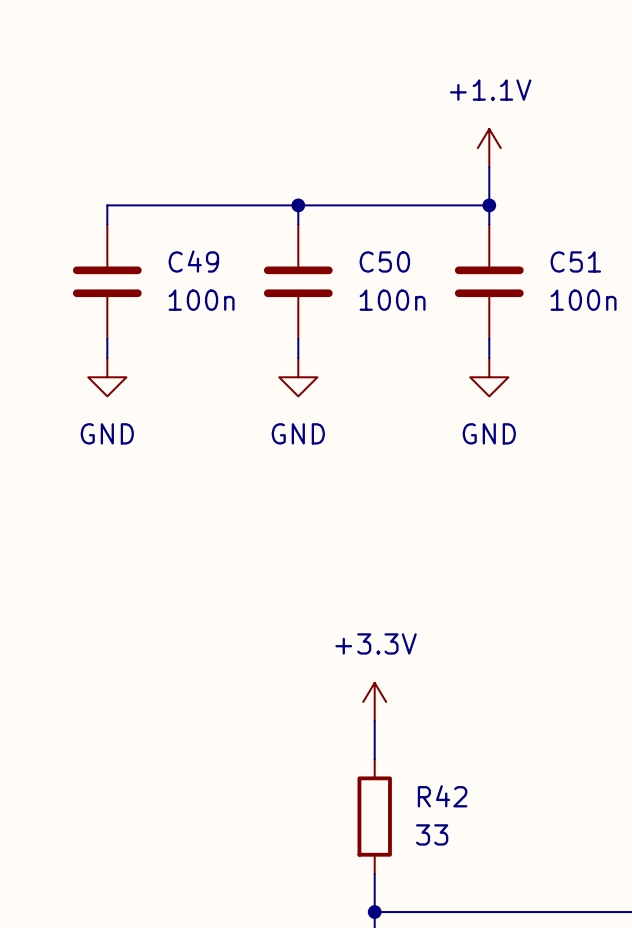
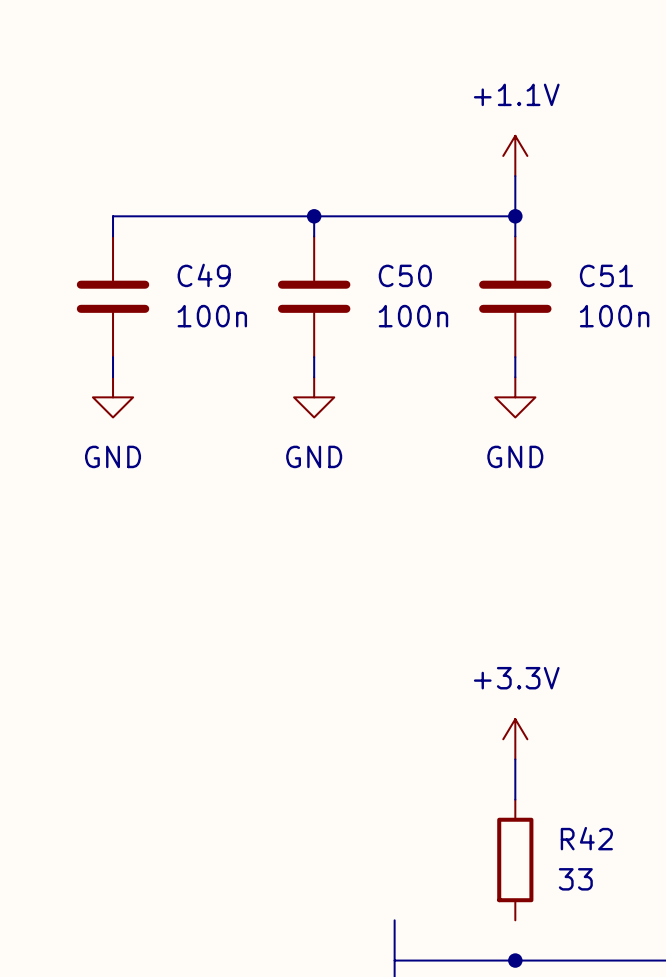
power symbol position: +3.3V (374, 701) -> +3.3V (515, 739)
wire: (374, 721) (374, 759) -> (515, 759) (515, 799)
R42 position: (374, 816) -> (515, 859)
junction: (374, 912) -> none
junction: none -> (515, 960)

